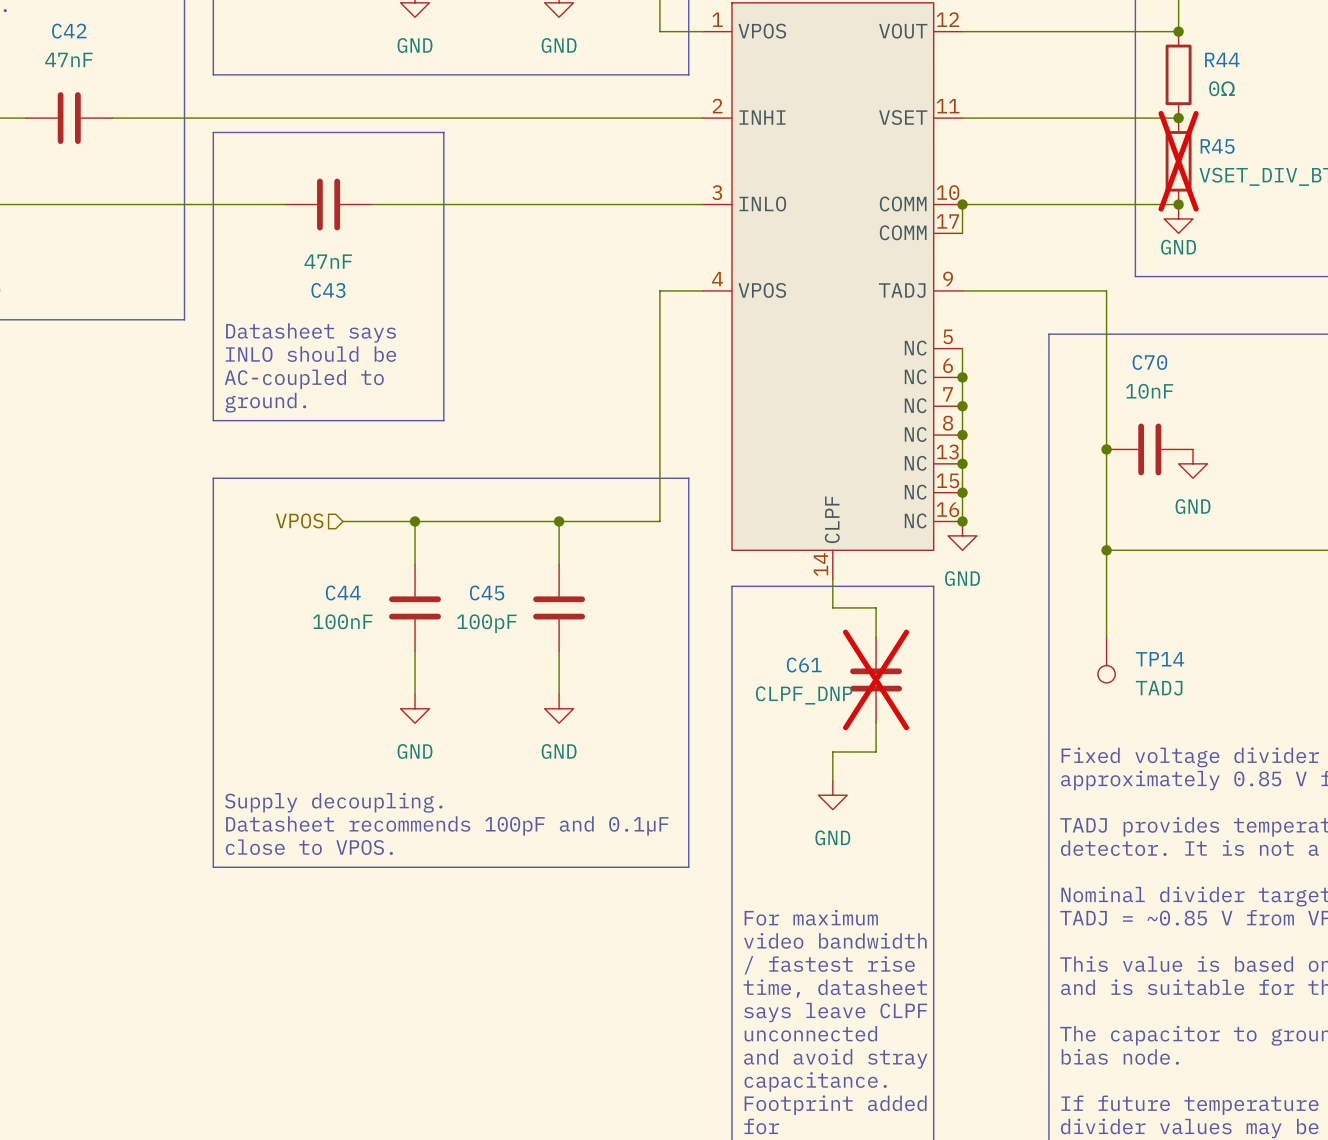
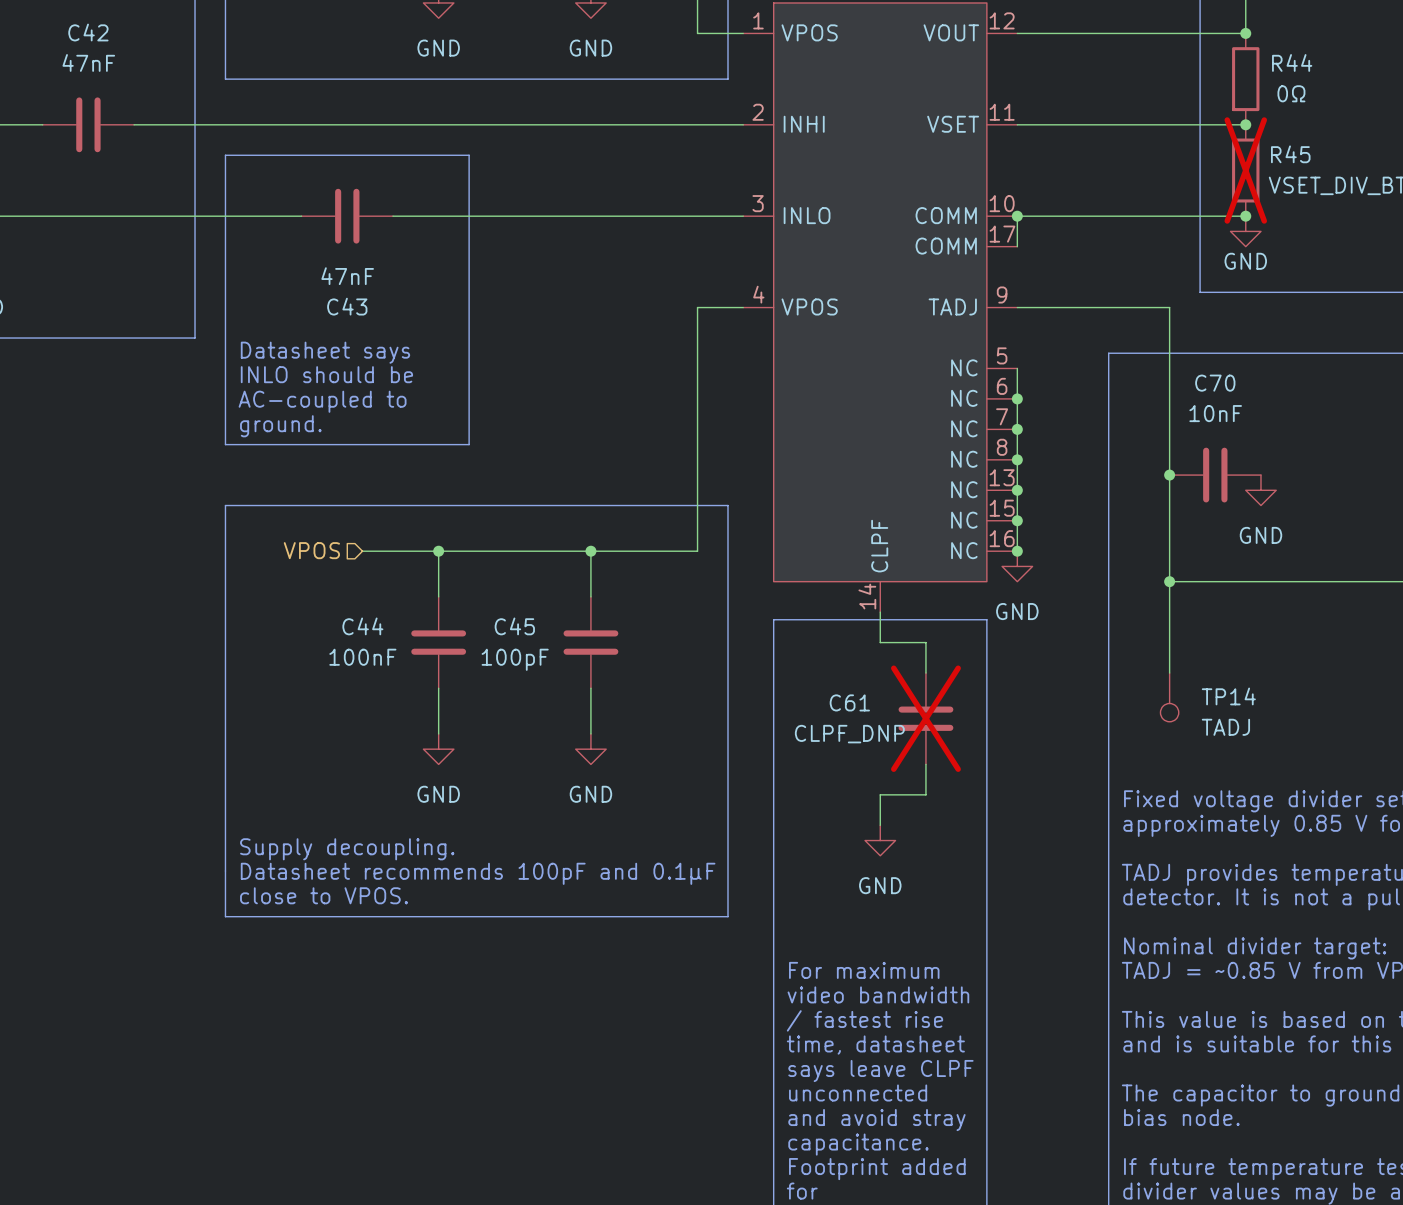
C42 position: (69, 118) -> (88, 124)
line: (213, 146) (213, 132) (443, 132) (443, 146) -> (225, 155) (469, 155)

